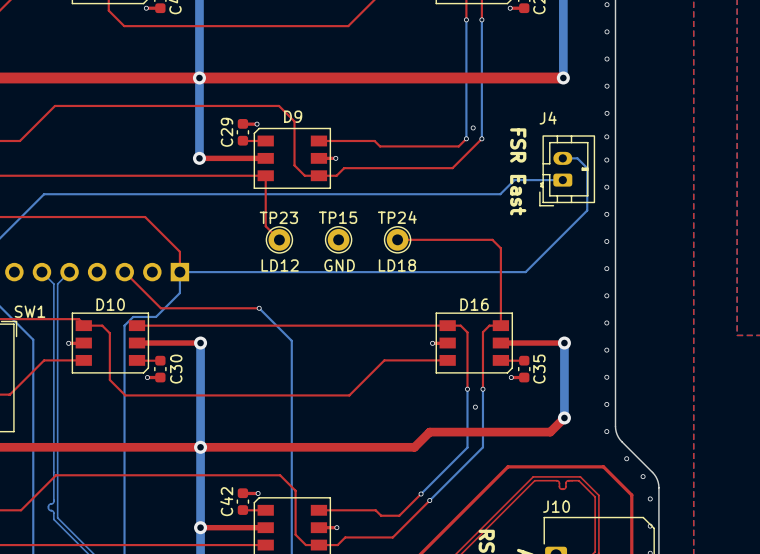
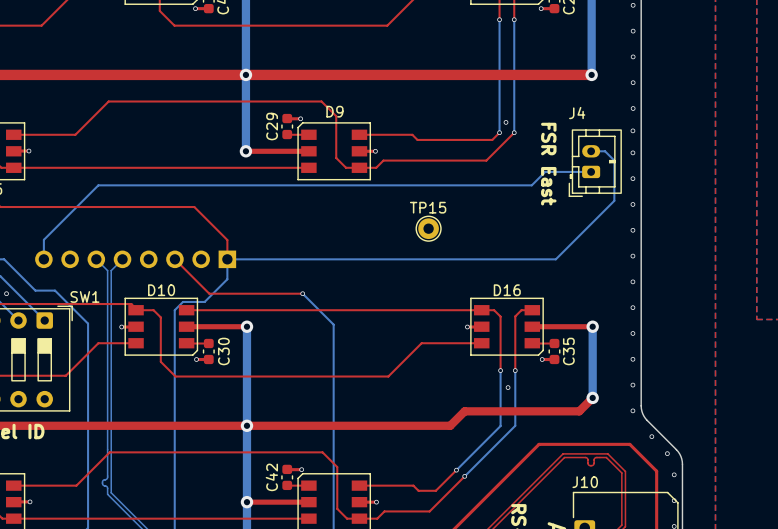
top track: (265, 175) (265, 226) (279, 239) -> none
TP23: (279, 239) -> none
TP15 position: (338, 239) -> (428, 228)
top track: (397, 239) (492, 239) (500, 248) (500, 325) -> none
TP24: (397, 239) -> none
text: LD12 (280, 265) -> none
text: GND (339, 265) -> none
text: LD18 (397, 265) -> none

